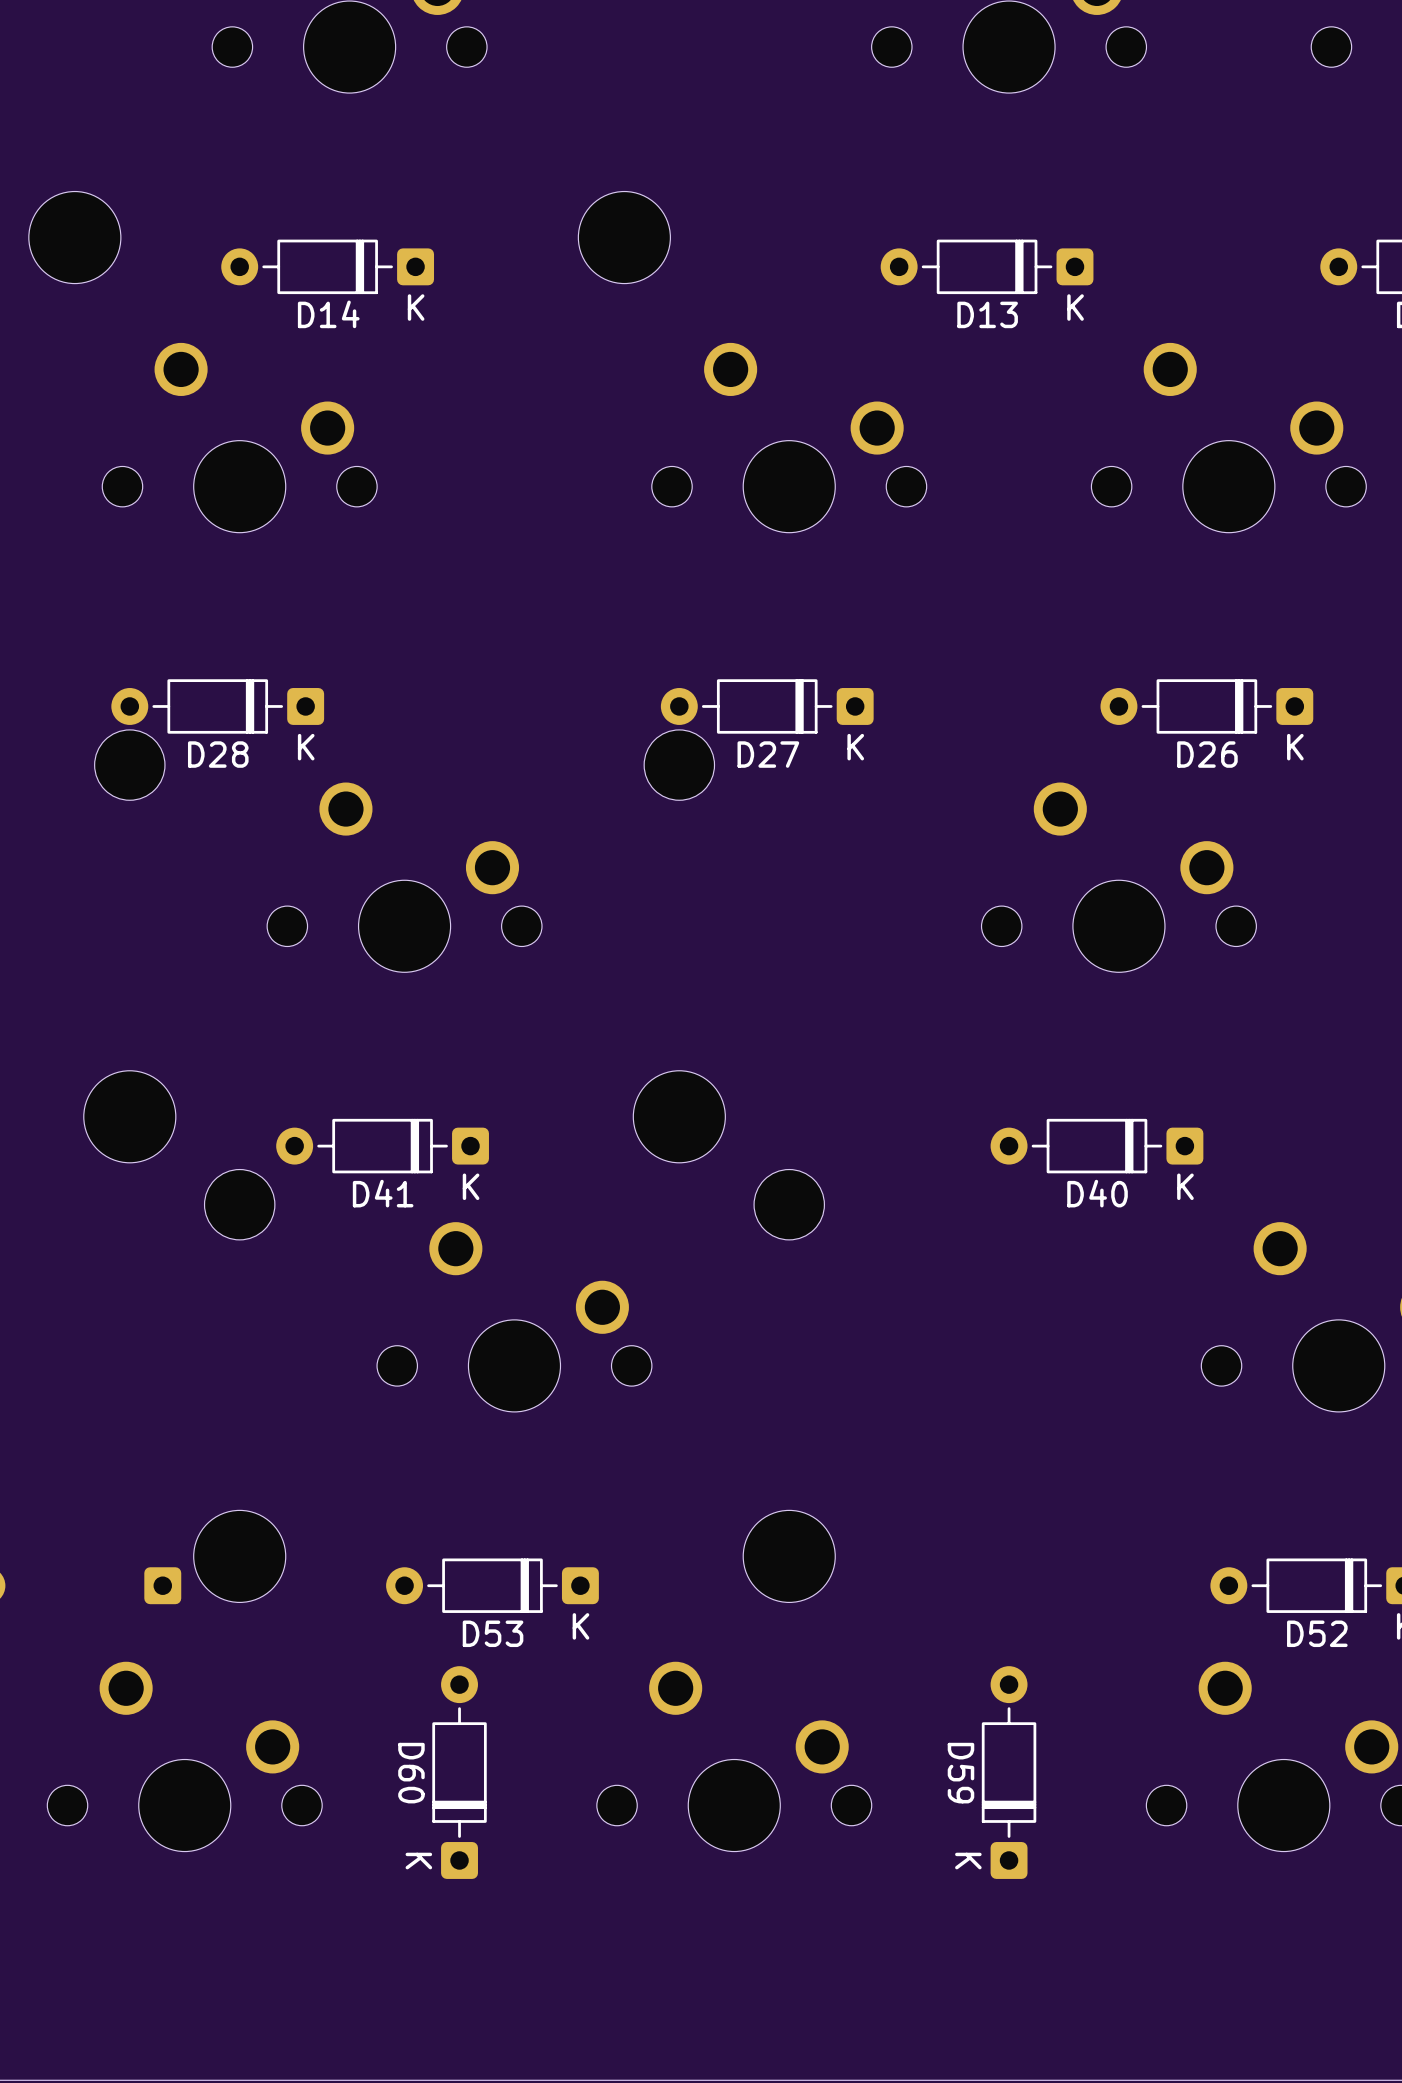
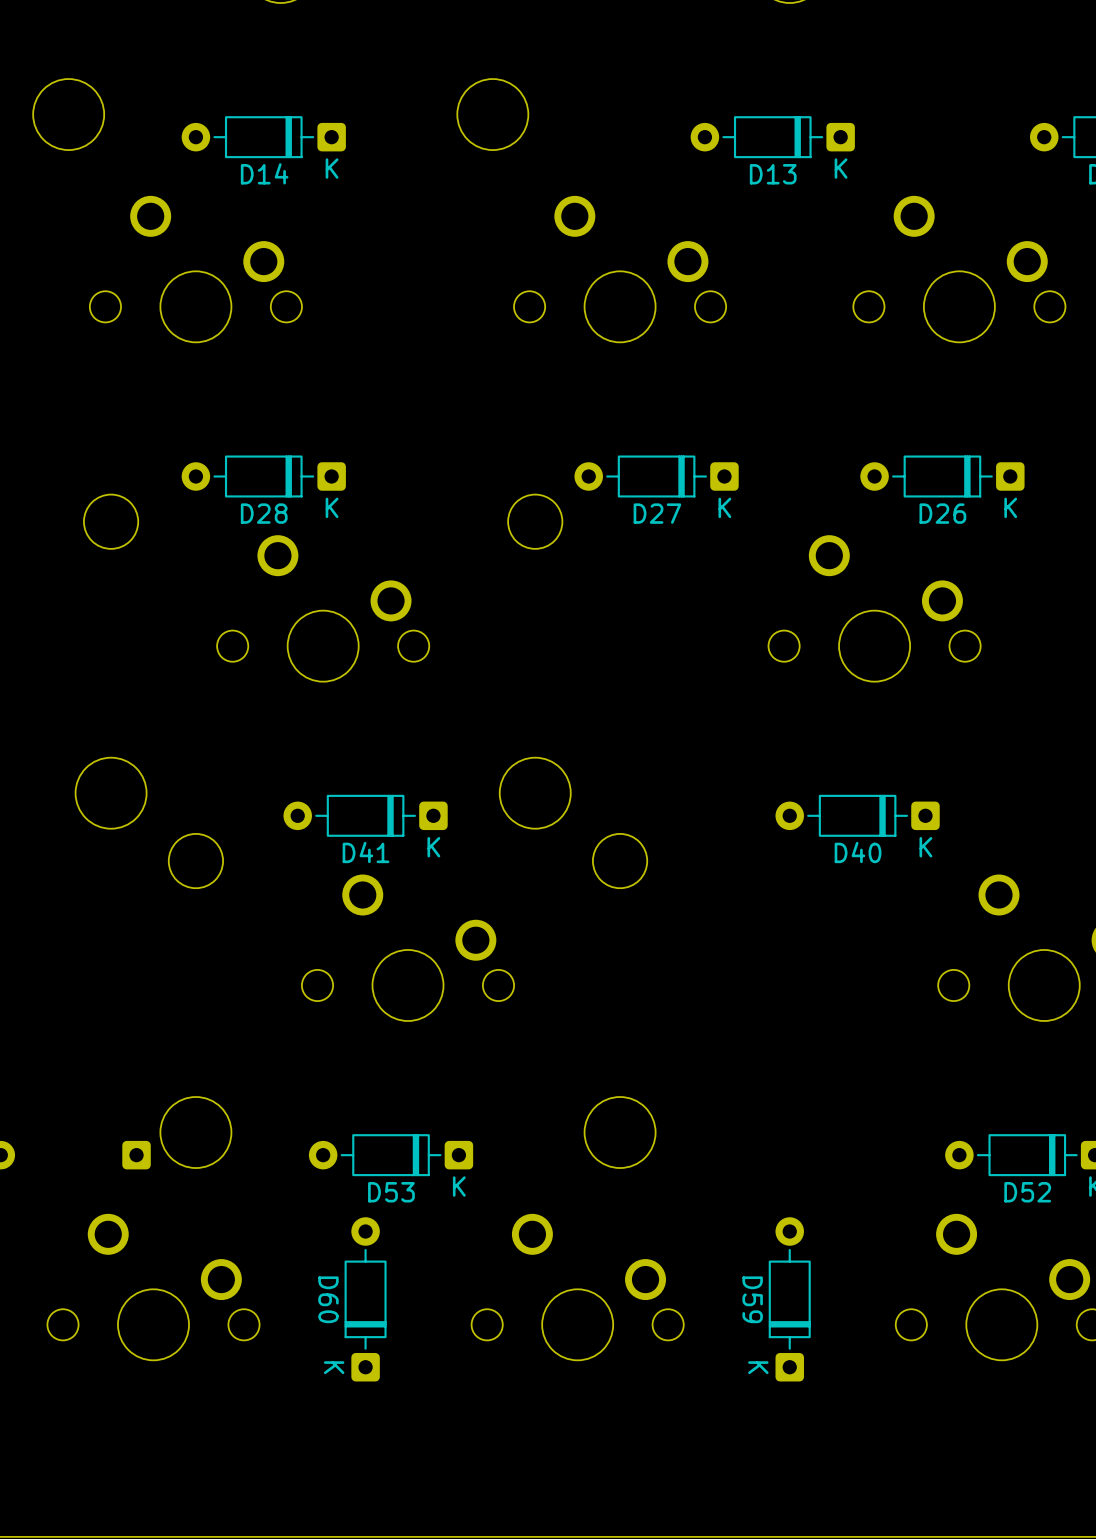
D28 position: (217, 706) -> (263, 476)
D27 position: (767, 706) -> (656, 476)
D41 position: (382, 1146) -> (365, 815)

